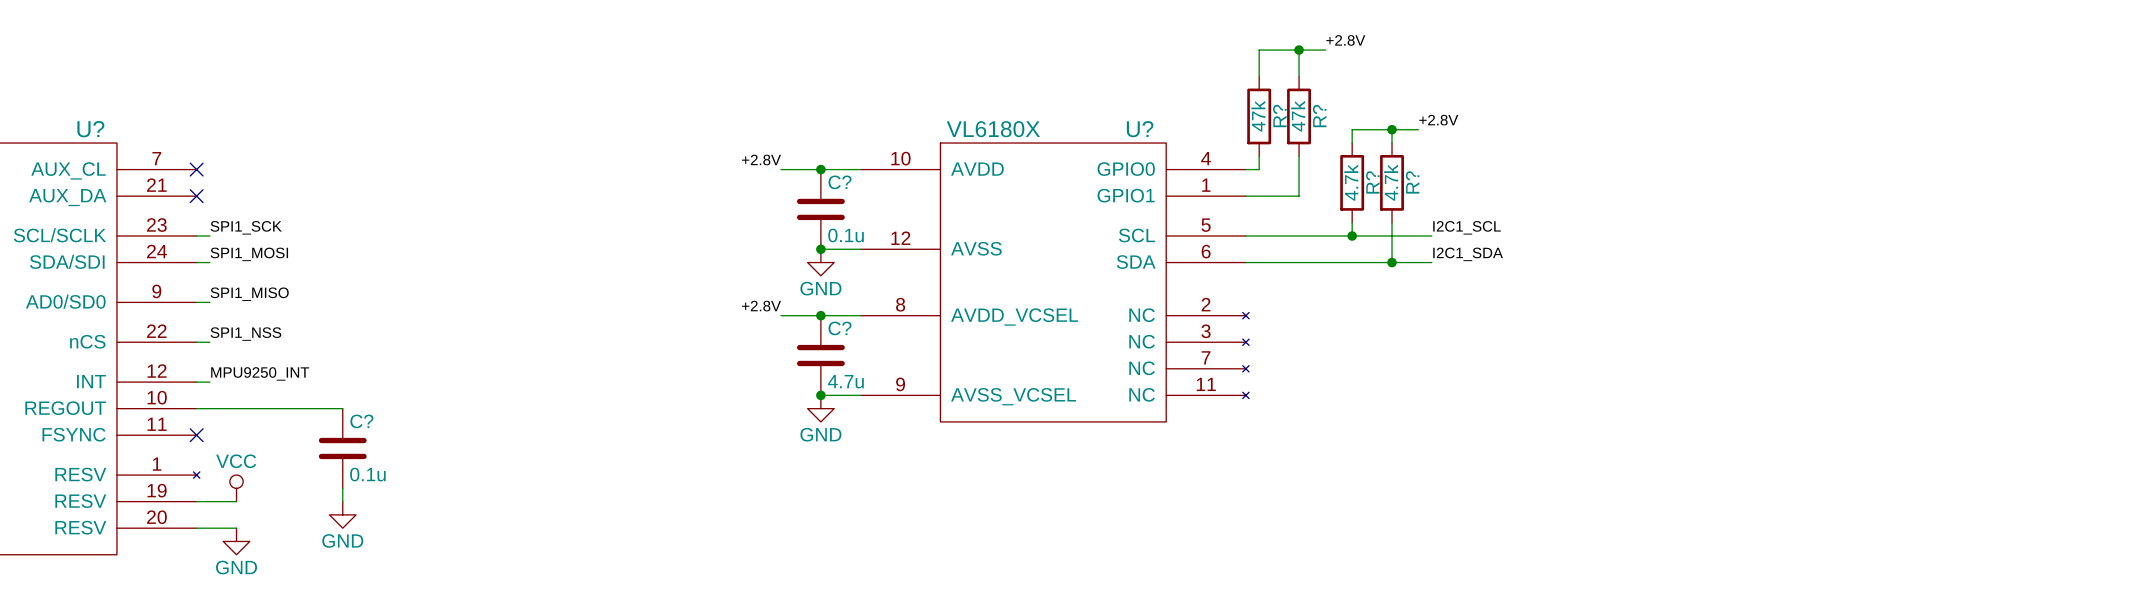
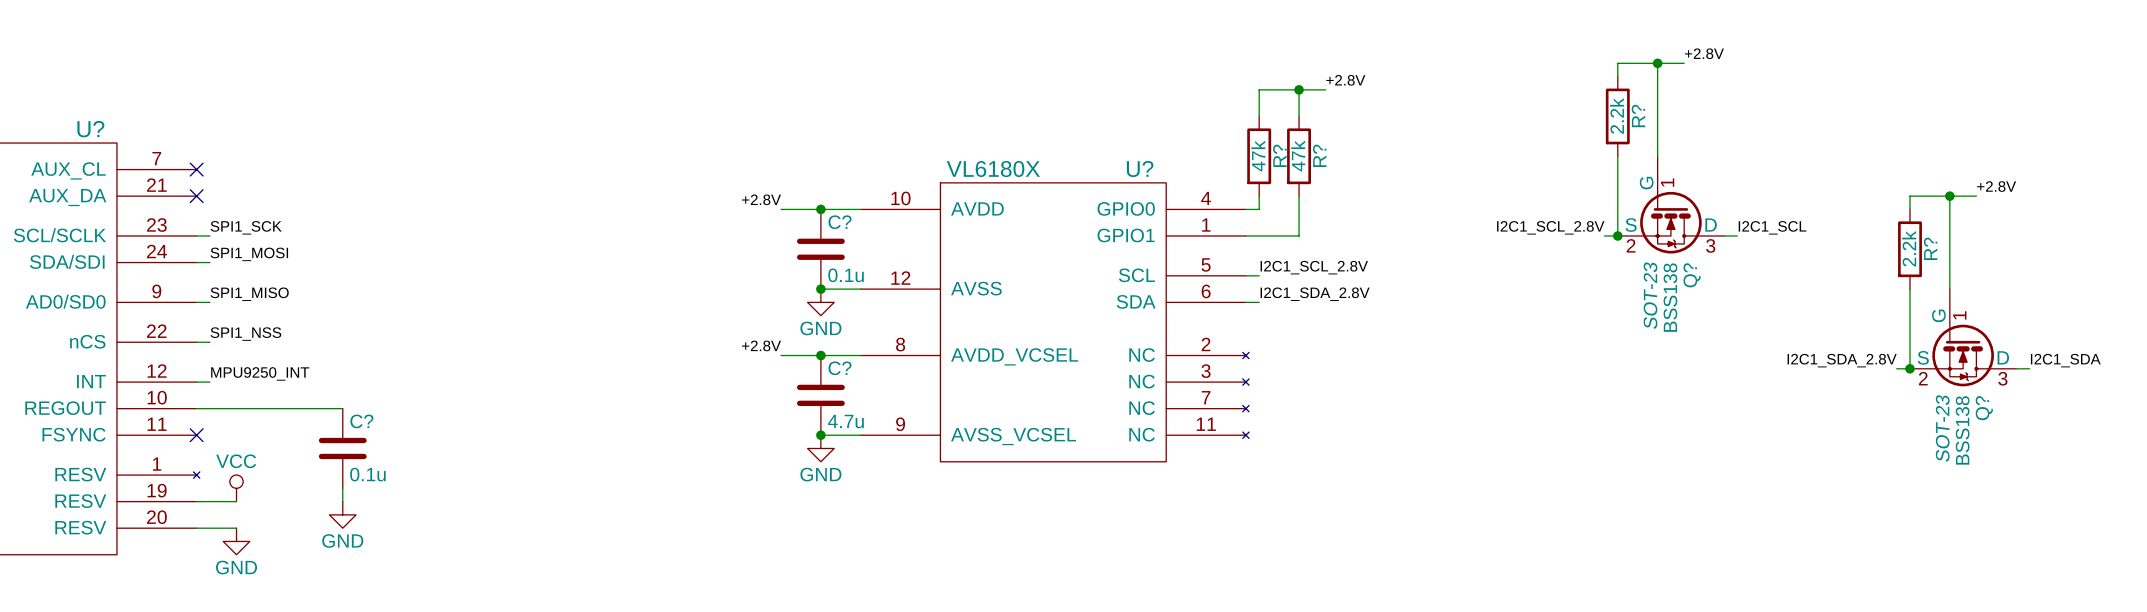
label position: +2.8V (1345, 40) -> +2.8V (1345, 80)
wire: (1299, 50) (1299, 76) -> (1299, 89) (1299, 116)
junction position: (1299, 50) -> (1299, 89)
wire: (1325, 50) (1259, 50) (1259, 76) -> (1325, 89) (1259, 89) (1259, 116)
label: none -> +2.8V (1704, 53)
wire: none -> (1657, 63) (1657, 156)
junction: none -> (1657, 63)
wire: none -> (1684, 63) (1617, 63) (1617, 76)
R?: 47k (1259, 116) -> none
R?: 47k (1299, 116) -> none
R?: none -> 2.2k (1617, 116)
label: +2.8V (1438, 120) -> none
wire: (1392, 129) (1392, 143) -> none
junction: (1392, 129) -> none
wire: (1418, 129) (1352, 129) (1352, 143) -> none
wire: (1259, 156) (1259, 169) (1245, 169) -> (1259, 196) (1259, 209) (1245, 209)
R?: none -> 47k (1259, 156)
wire: (1299, 156) (1299, 196) (1245, 196) -> none
R?: none -> 47k (1299, 156)
wire: none -> (1617, 156) (1617, 235) (1604, 235)
label position: +2.8V (761, 159) -> +2.8V (761, 199)
wire: (781, 169) (860, 169) -> (781, 209) (860, 209)
junction: (820, 169) -> none
R?: 4.7k (1352, 182) -> none
R?: 4.7k (1392, 182) -> none
label: none -> +2.8V (1996, 186)
wire: none -> (1949, 196) (1949, 289)
junction: none -> (1949, 196)
wire: none -> (1976, 196) (1909, 196) (1909, 209)
Q?: none -> BSS138 (1670, 204)
C? position: (820, 209) -> (820, 249)
junction: none -> (820, 209)
wire: (1352, 222) (1352, 235) -> none
wire: (1392, 222) (1392, 262) -> none
label: I2C1_SCL (1467, 227) -> I2C1_SCL_2.8V (1550, 227)
label: none -> I2C1_SCL (1772, 227)
wire: (1299, 235) (1431, 235) -> (1299, 235) (1299, 196)
junction: (1352, 235) -> none
junction: none -> (1617, 235)
wire: none -> (1724, 235) (1737, 235)
wire: (820, 249) (860, 249) -> (820, 289) (860, 289)
junction: (820, 249) -> none
R?: none -> 2.2k (1909, 249)
label: I2C1_SDA (1468, 254) -> none
power symbol position: GND (820, 262) -> GND (820, 302)
wire: (1245, 262) (1431, 262) -> none
junction: (1392, 262) -> none
label: none -> I2C1_SCL_2.8V (1314, 267)
wire: none -> (1245, 275) (1259, 275)
U? position: (1054, 282) -> (1054, 322)
junction: none -> (820, 289)
wire: none -> (1909, 289) (1909, 368) (1896, 368)
label: none -> I2C1_SDA_2.8V (1315, 294)
wire: none -> (1245, 302) (1259, 302)
label position: +2.8V (761, 306) -> +2.8V (761, 345)
wire: (781, 315) (860, 315) -> (781, 355) (860, 355)
junction: (820, 315) -> none
Q?: none -> BSS138 (1963, 337)
C? position: (820, 355) -> (820, 395)
junction: none -> (820, 355)
label: none -> I2C1_SDA_2.8V (1842, 360)
label: none -> I2C1_SDA (2065, 360)
junction: none -> (1909, 368)
wire: none -> (2016, 368) (2029, 368)
wire: (820, 395) (860, 395) -> (820, 435) (860, 435)
junction: (820, 395) -> none
power symbol position: GND (820, 408) -> GND (820, 448)
junction: none -> (820, 435)

